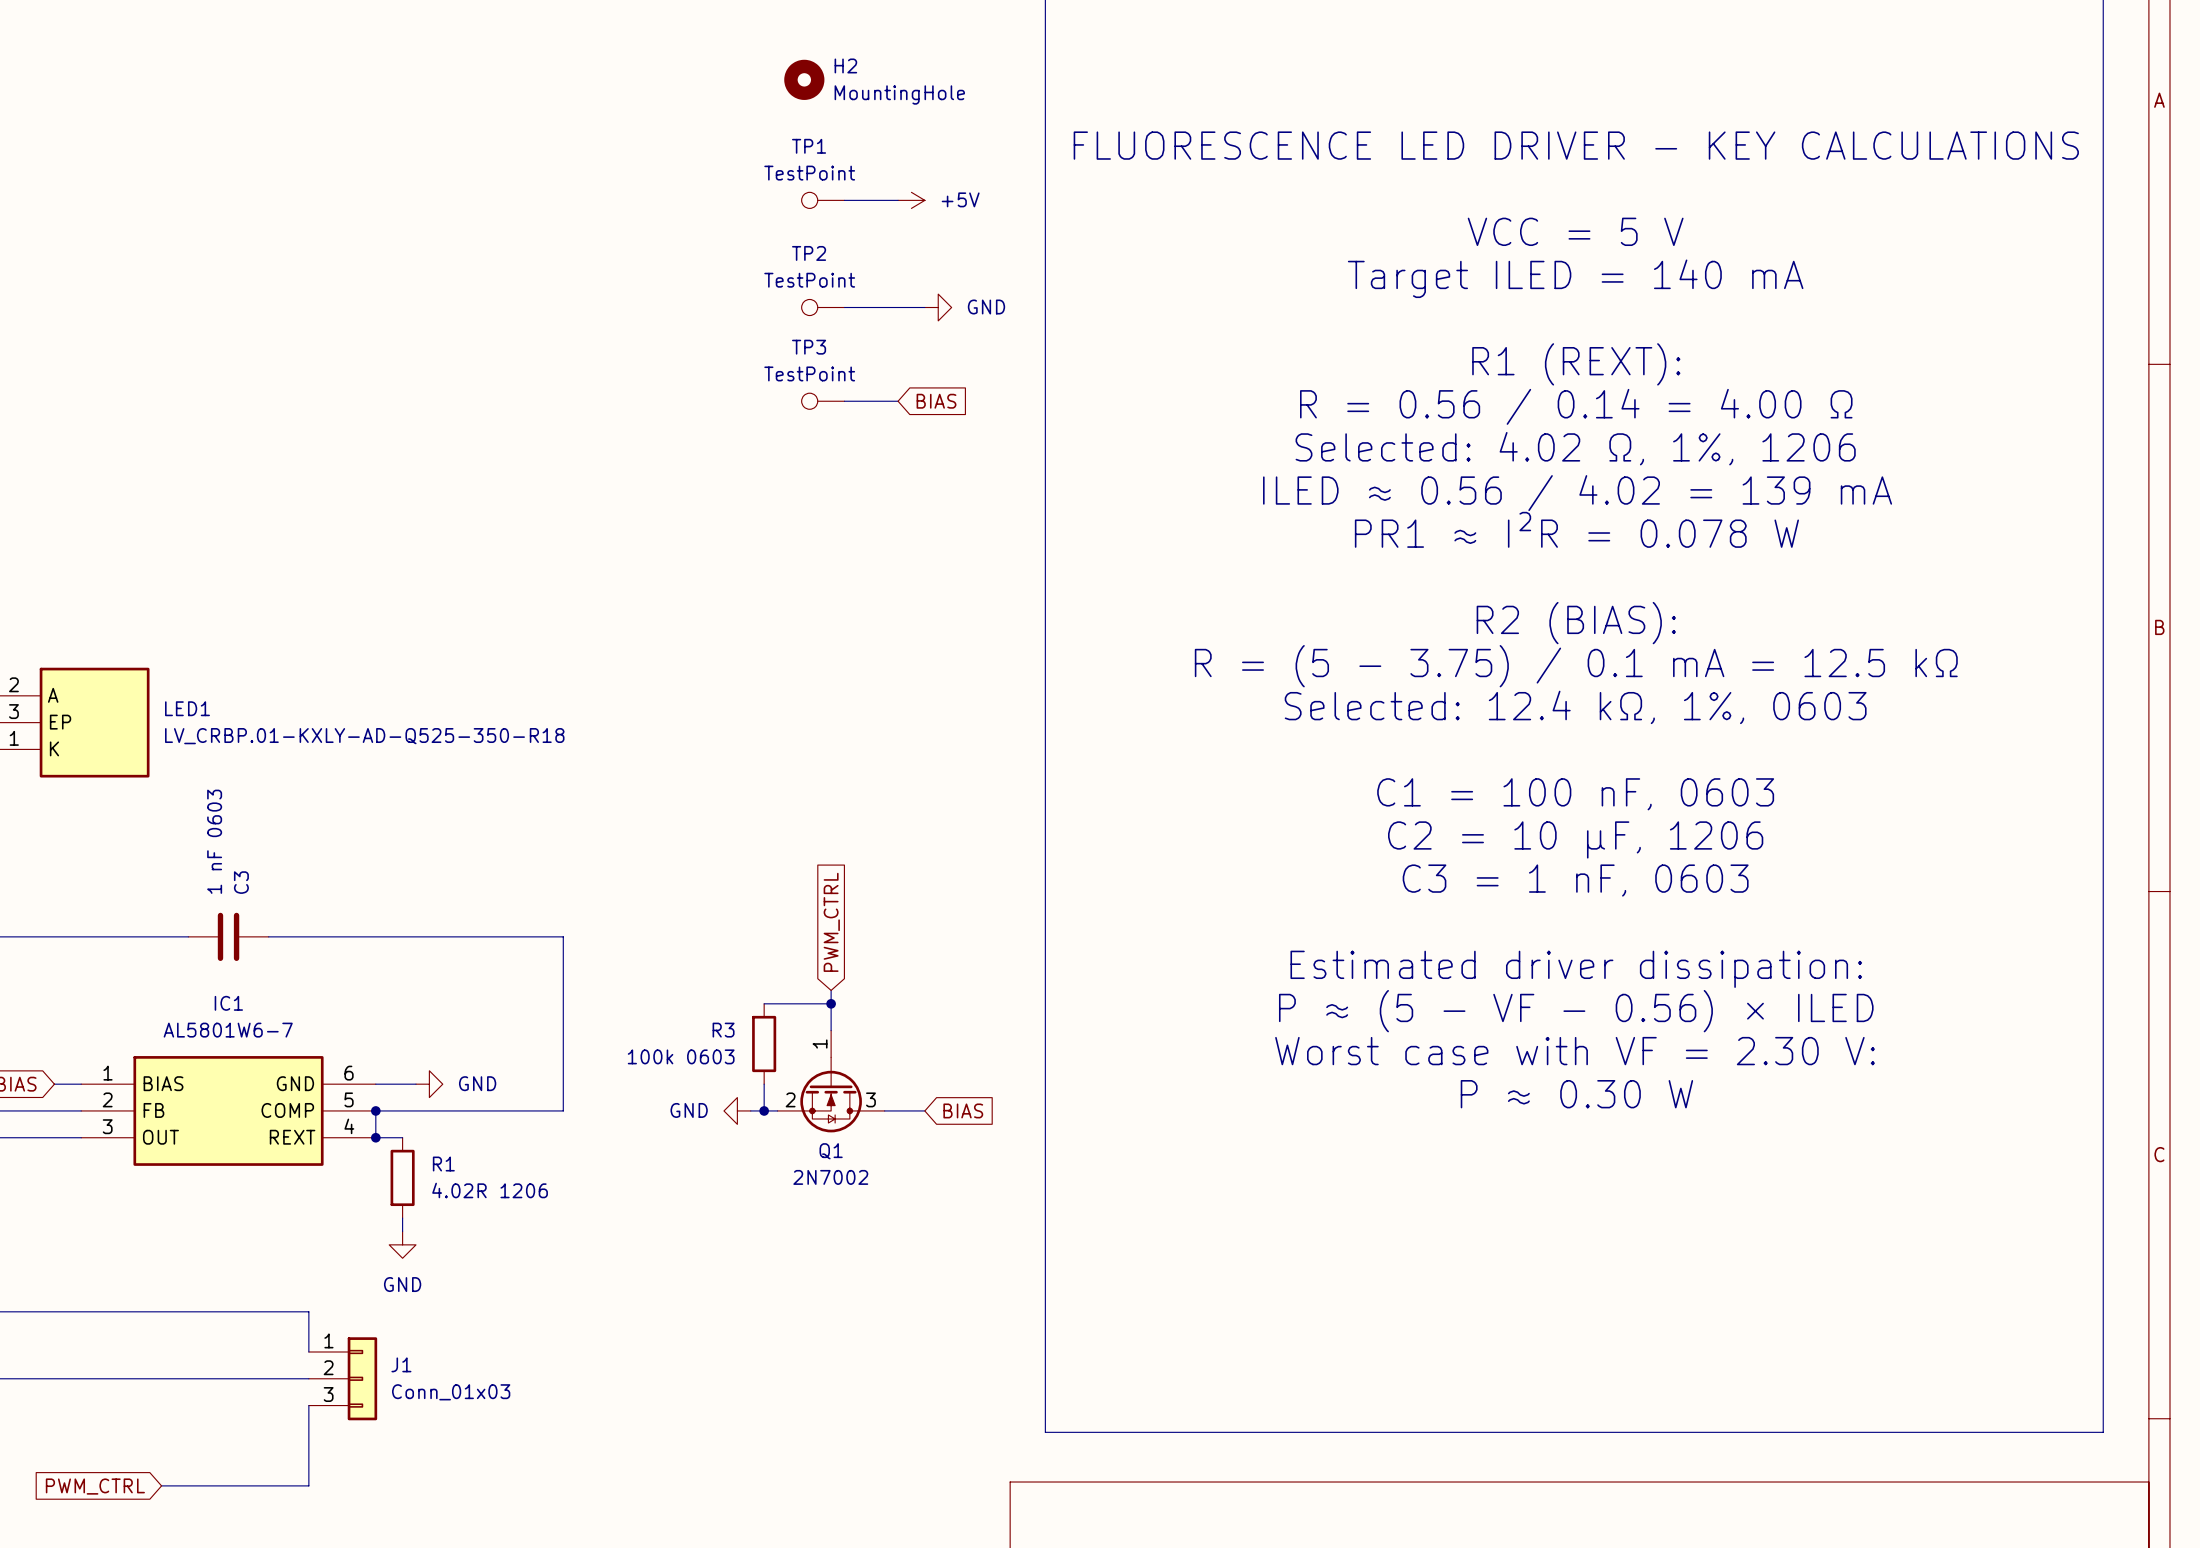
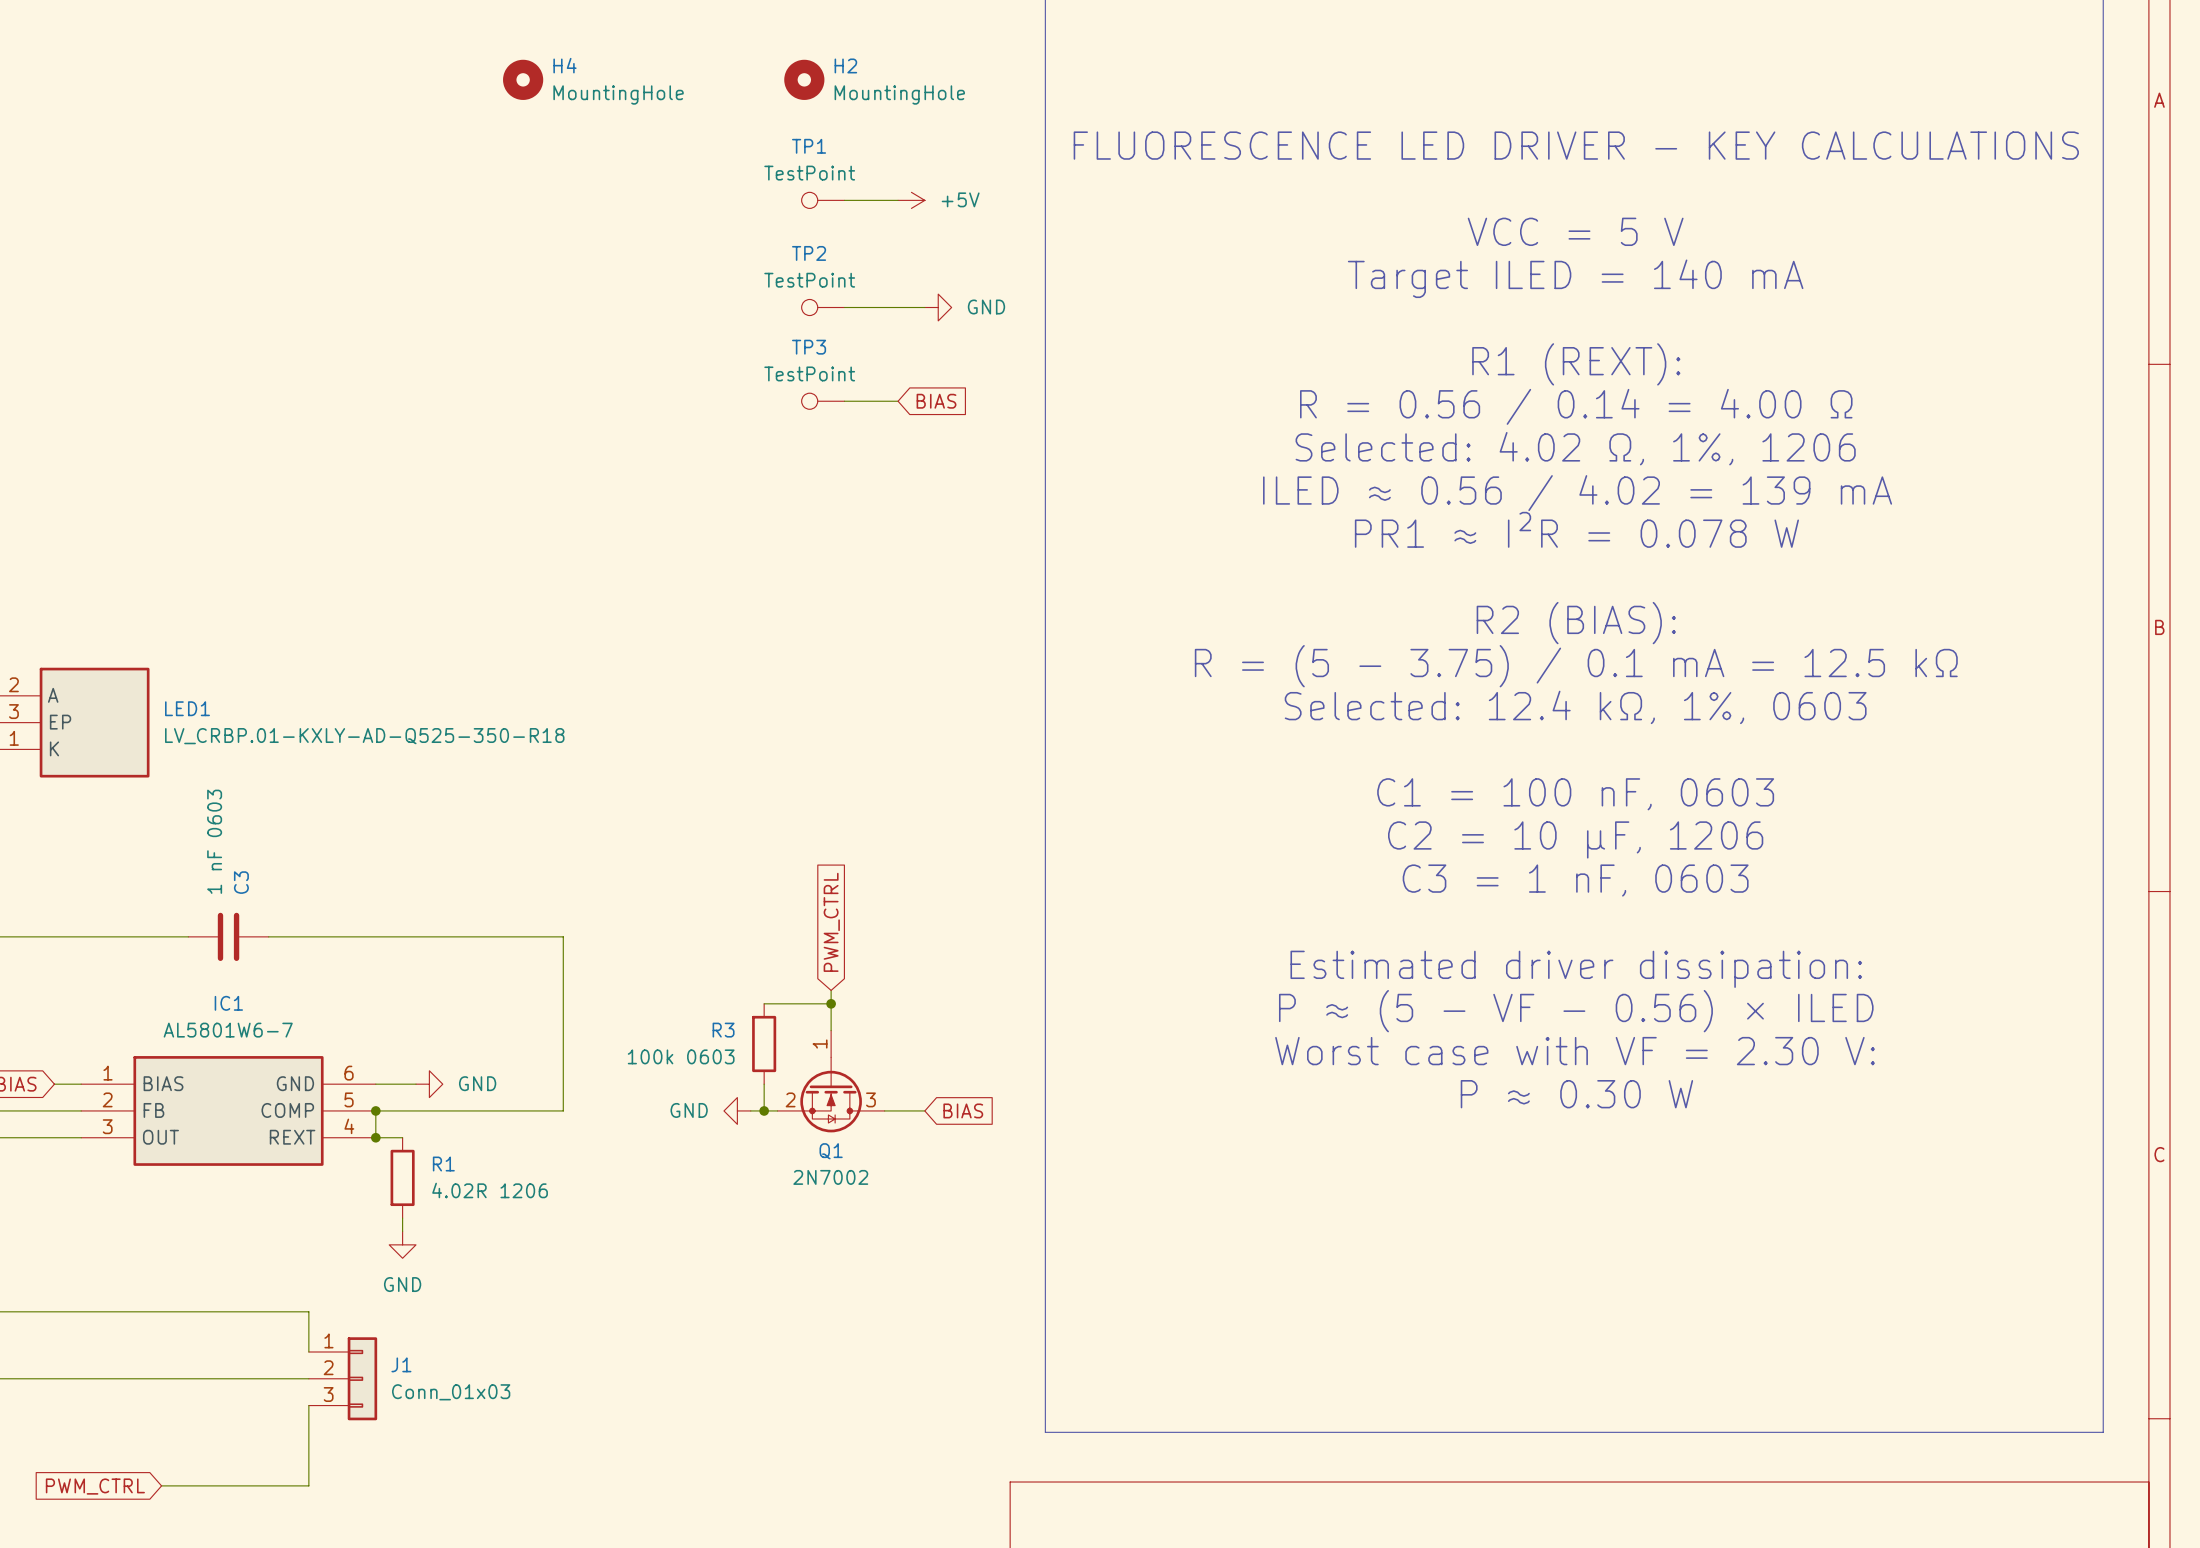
H4: none -> MountingHole (523, 79)

